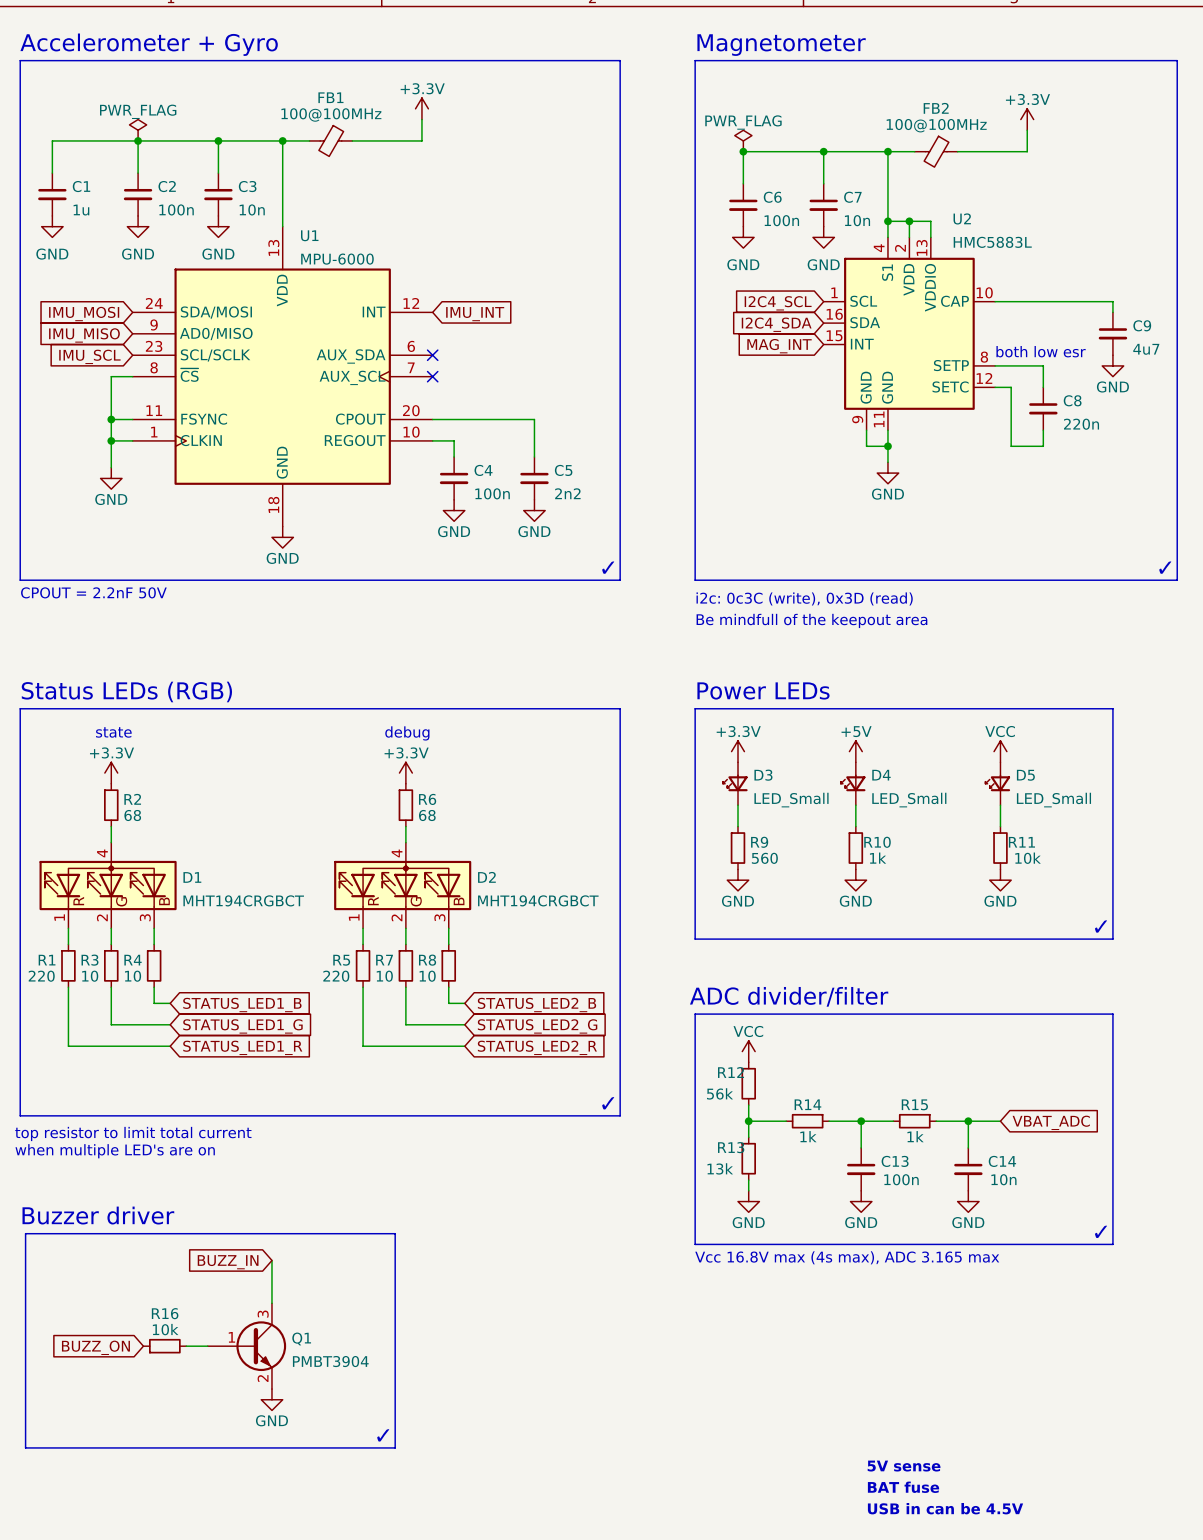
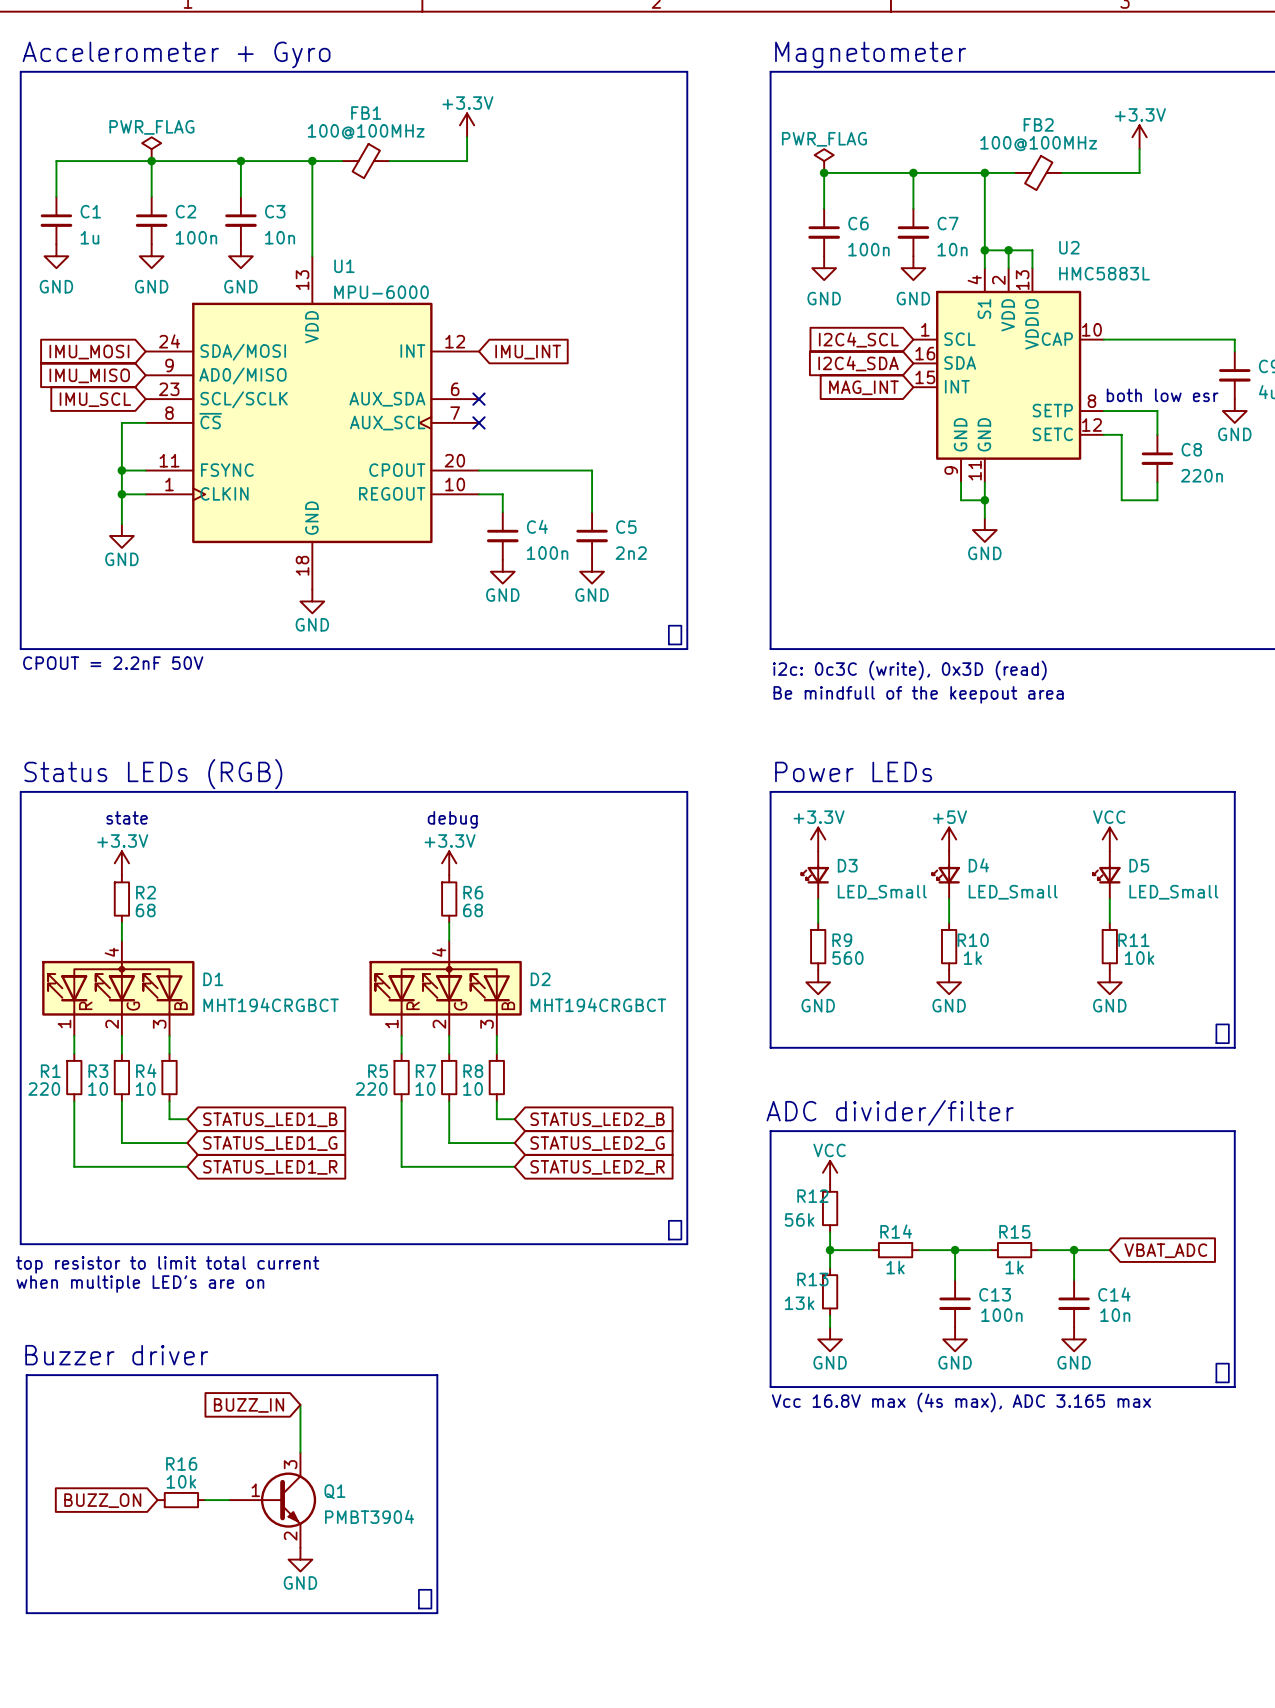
text: 5V sense (904, 1466) -> none
text: BAT fuse (903, 1487) -> none
text: USB in can be 4.5V (945, 1508) -> none

